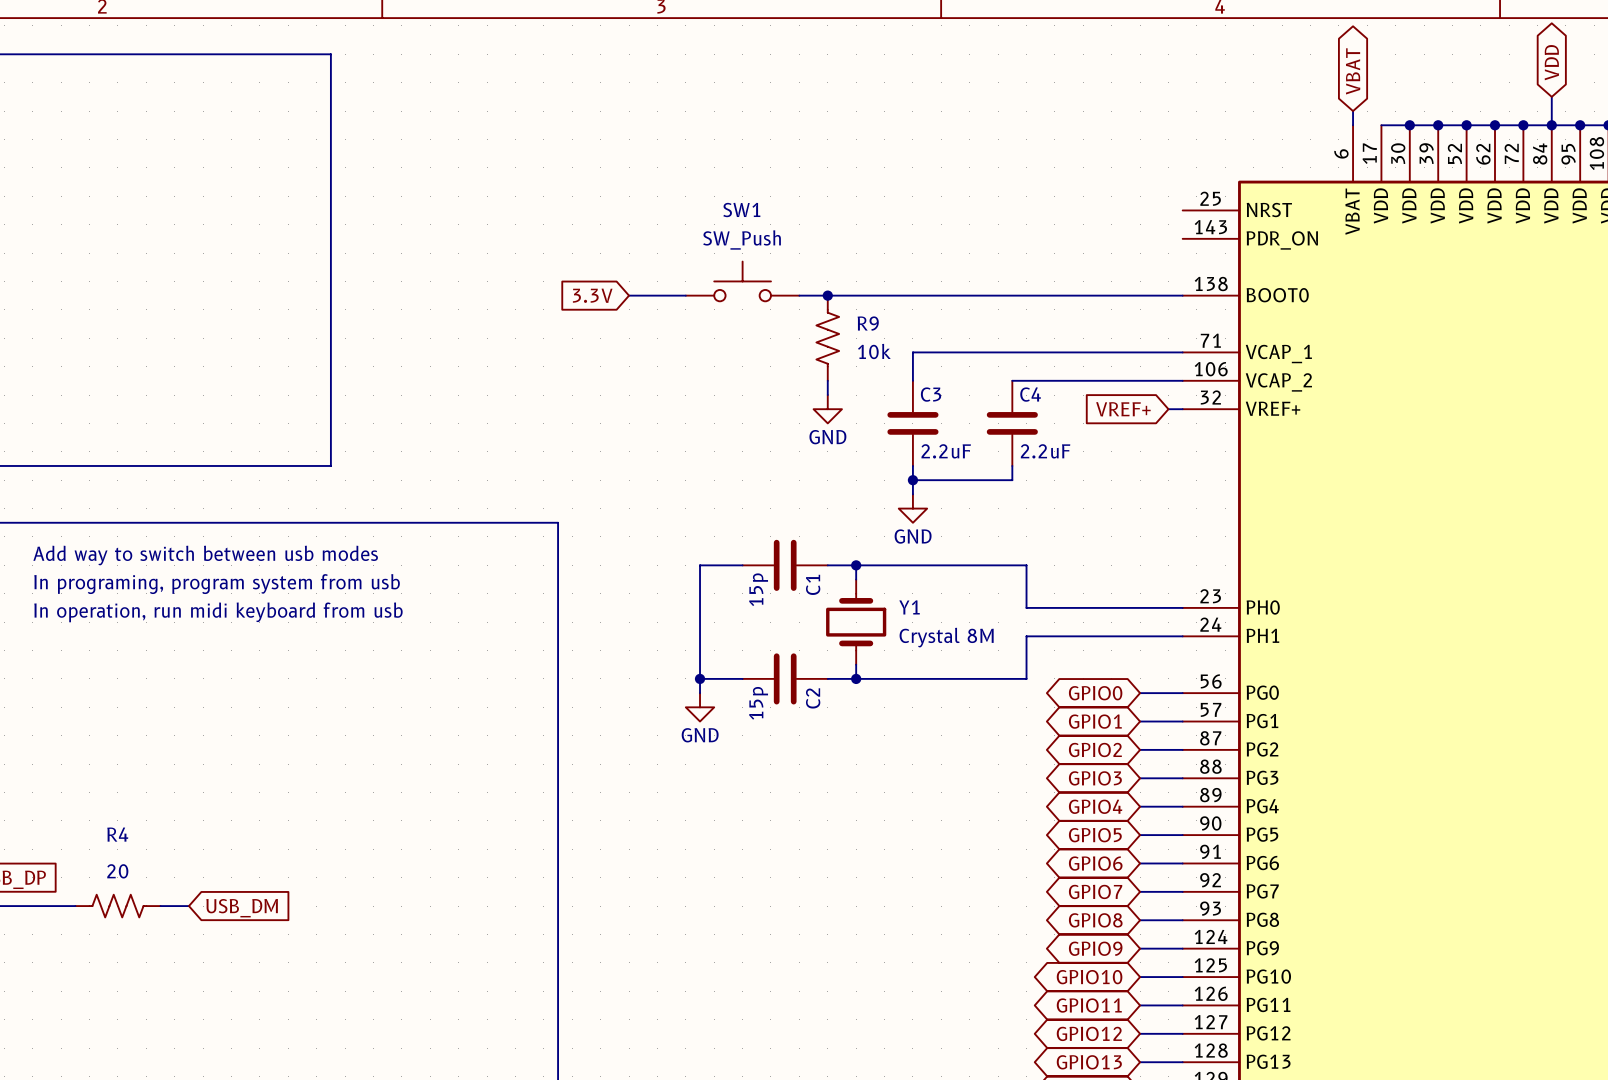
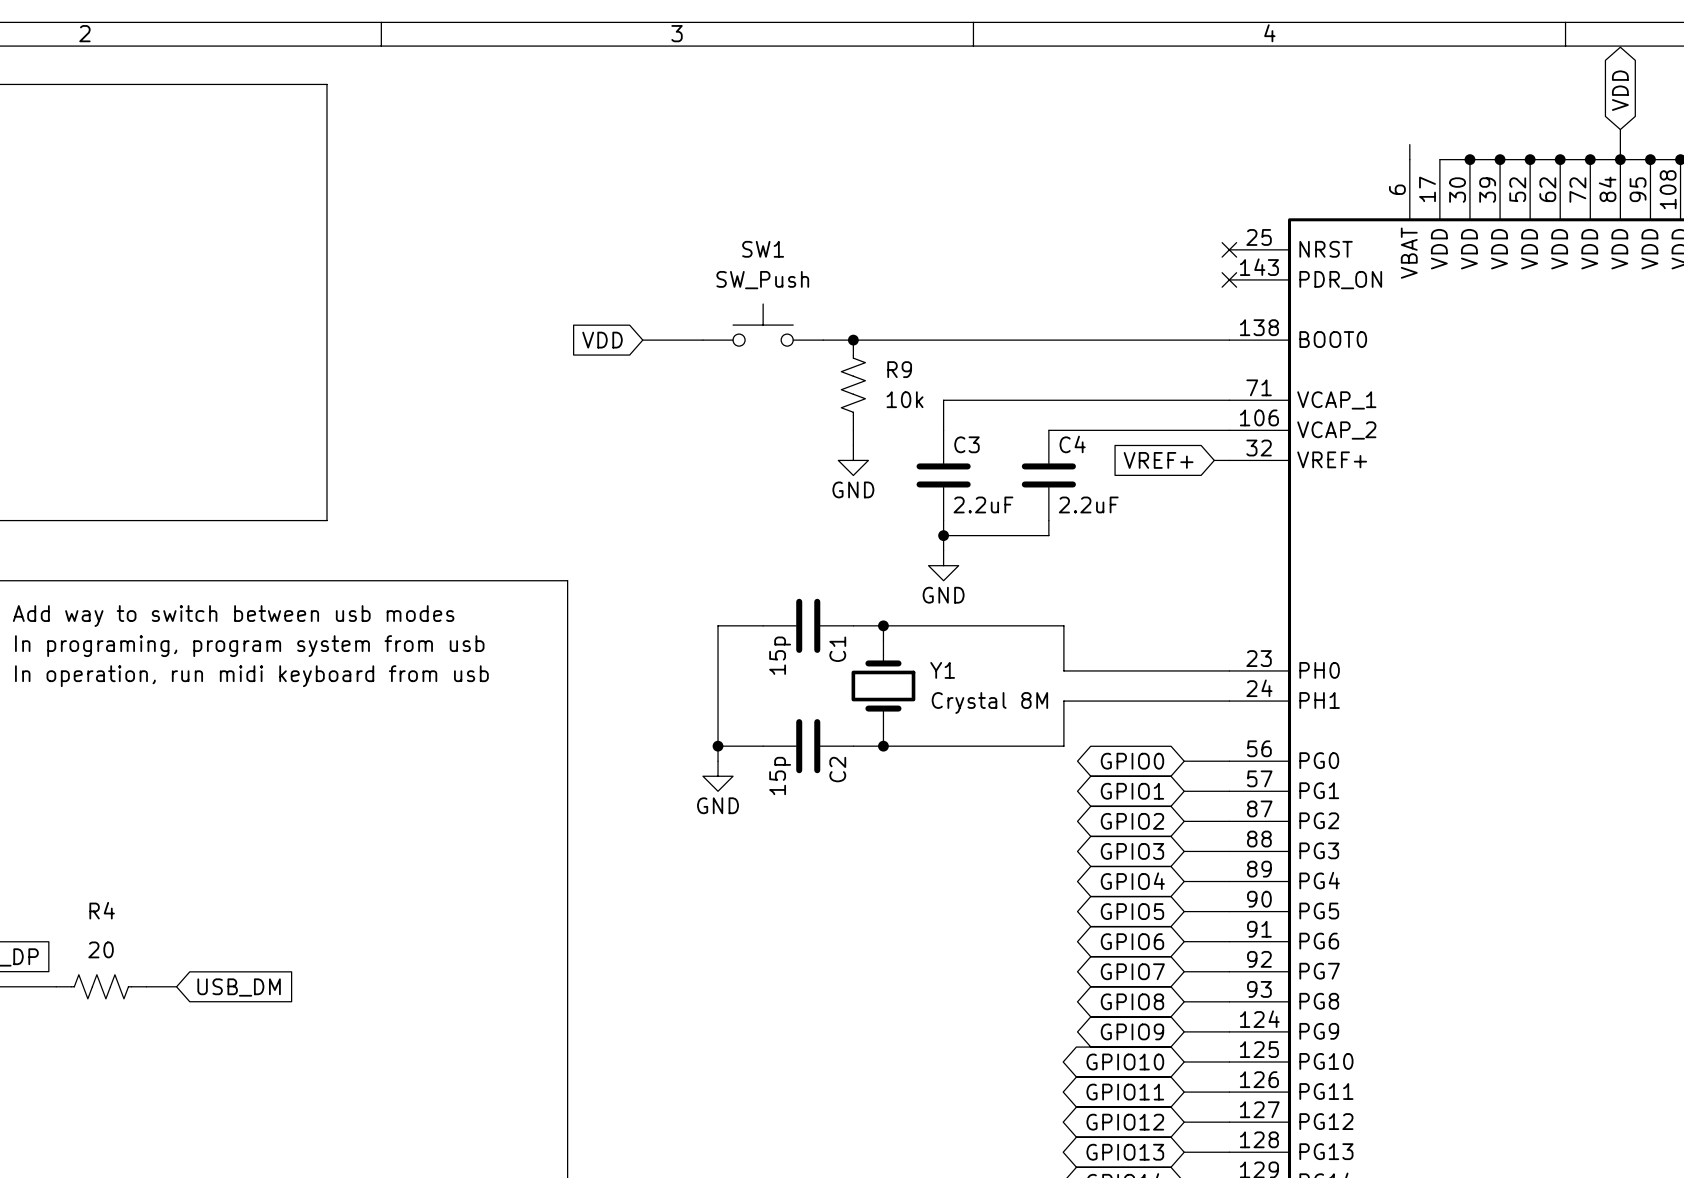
global label: VBAT (1353, 71) -> none
no-connect mark: none -> (1229, 249)
no-connect mark: none -> (1229, 279)
global label: 3.3V (592, 295) -> VDD (602, 340)

